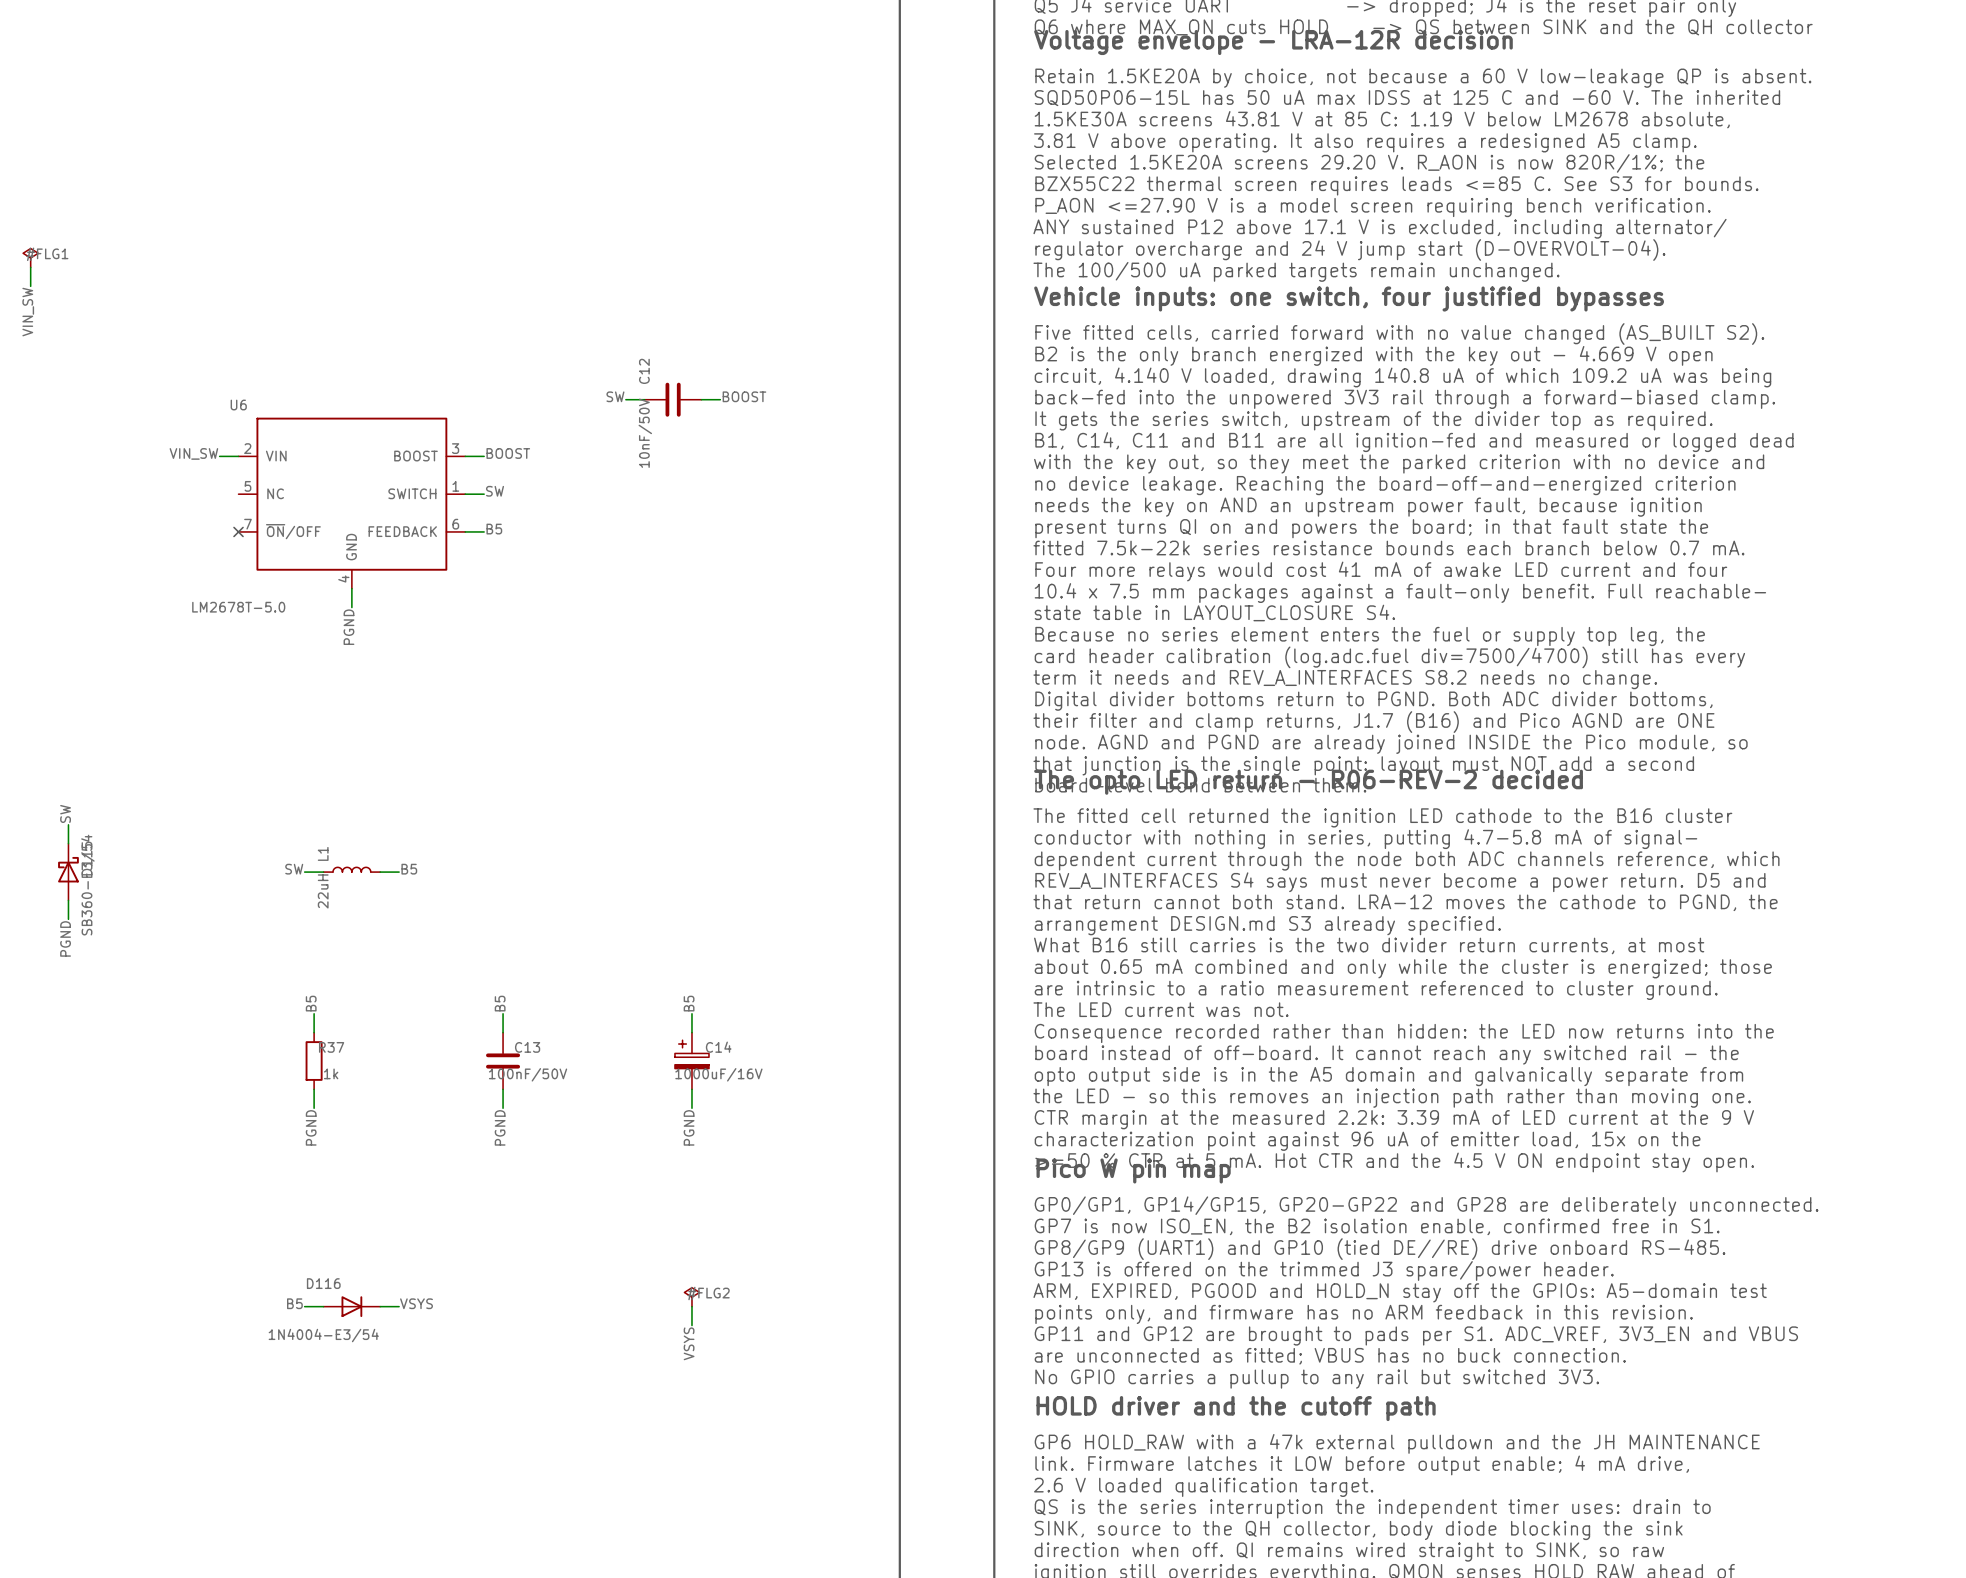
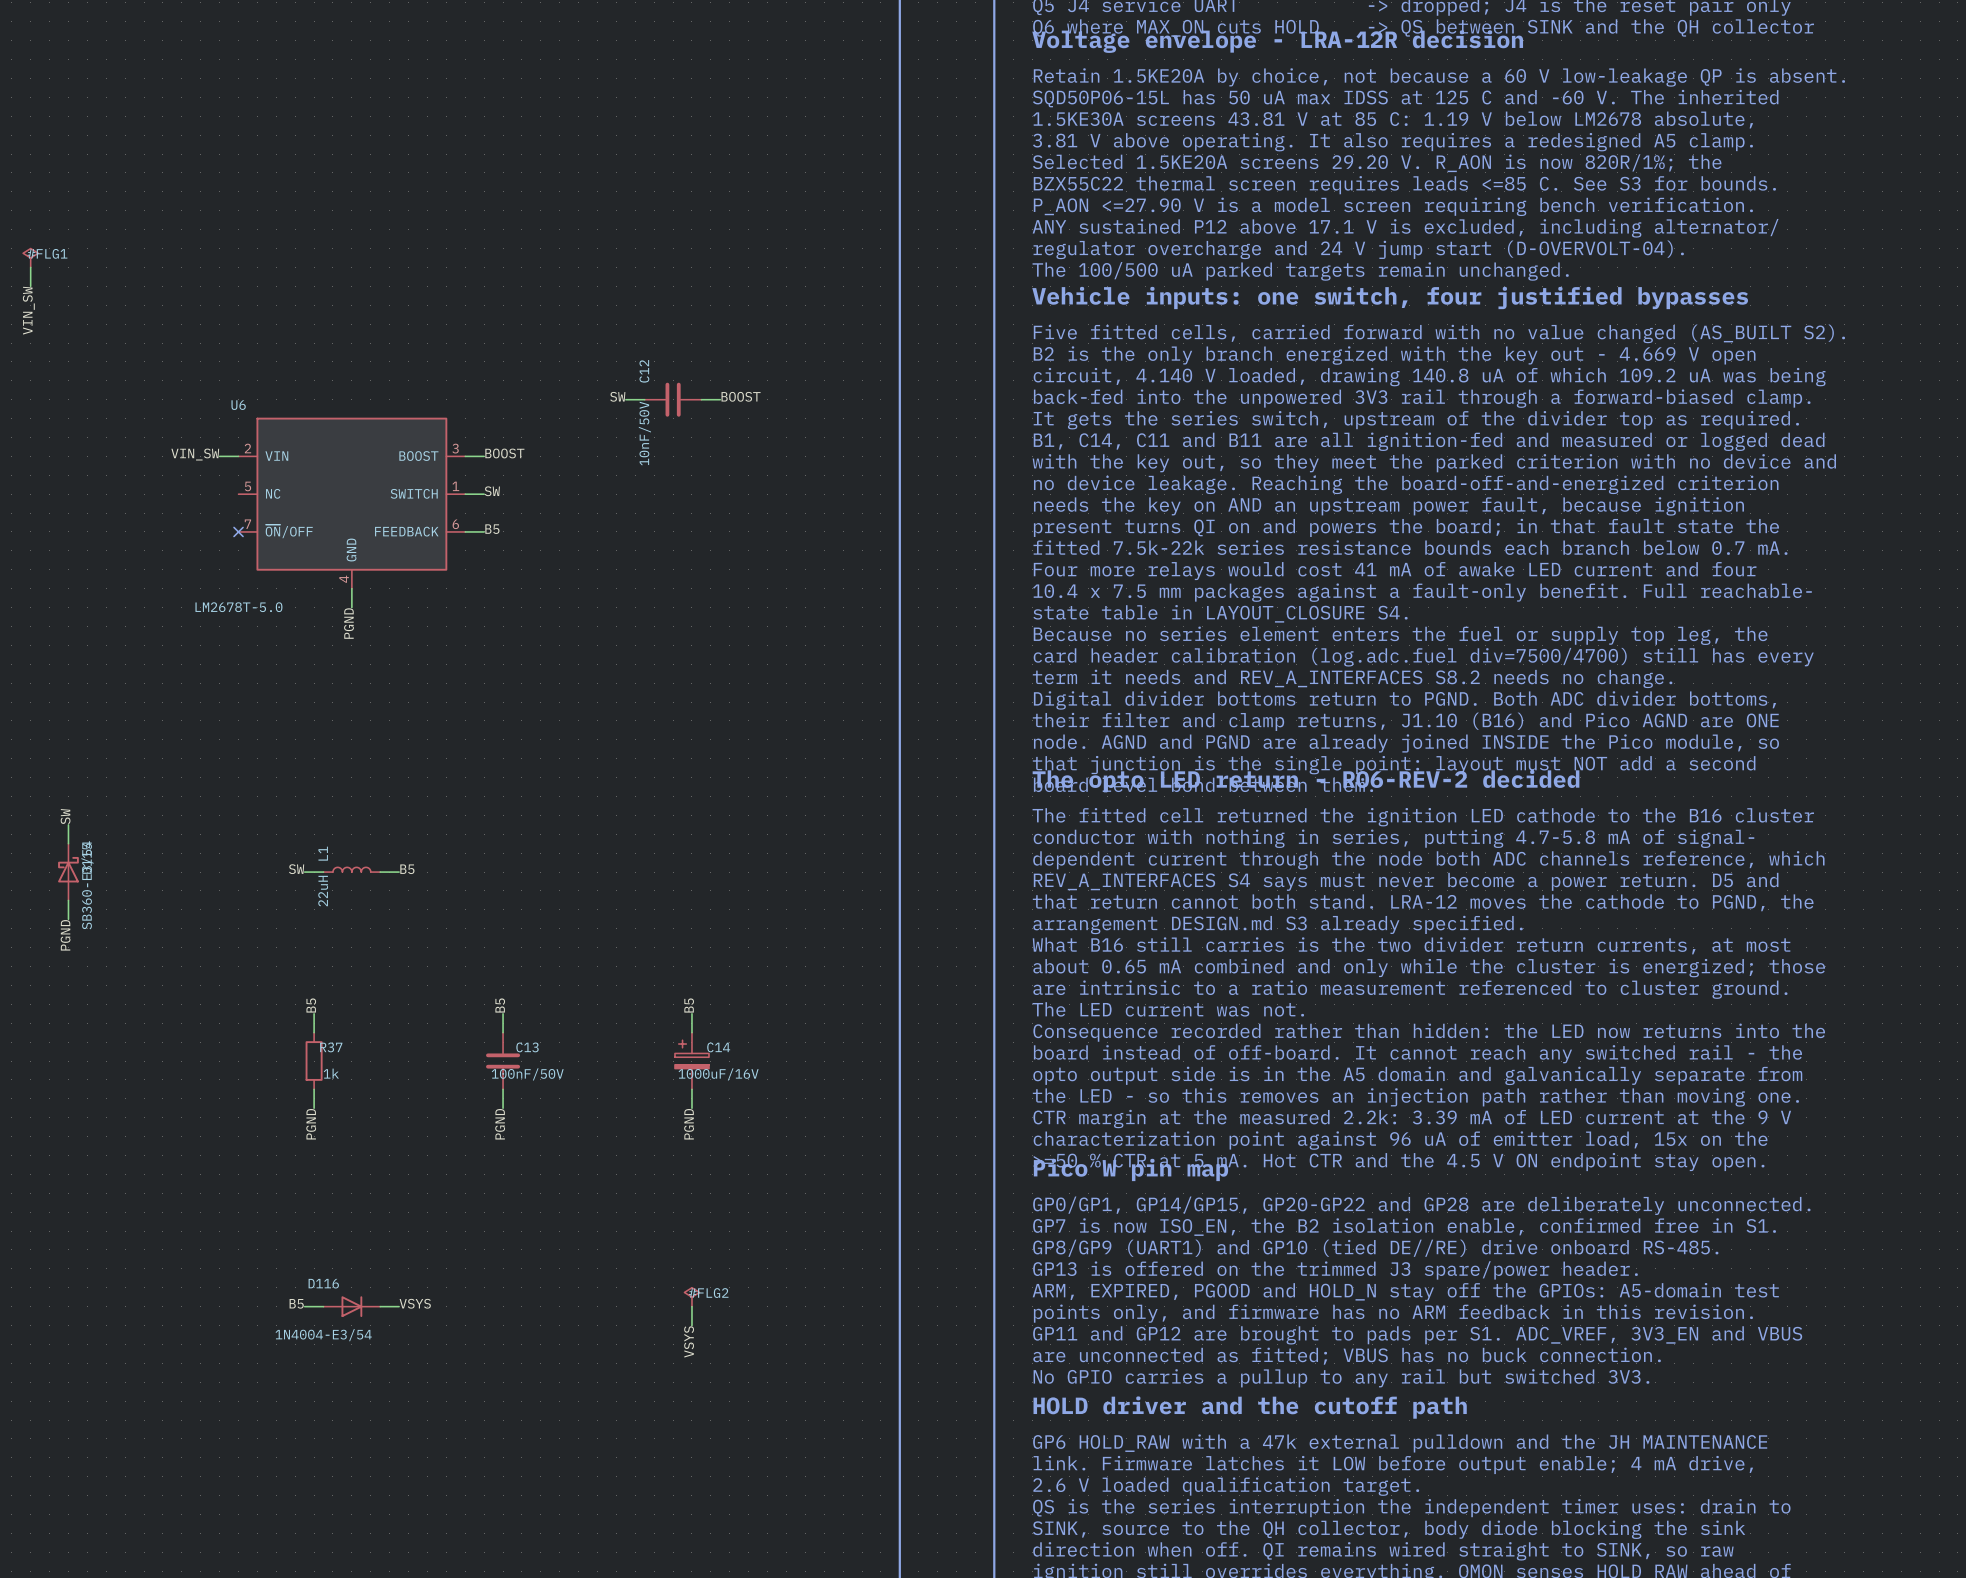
text: their filter and clamp returns, J1.7 (B16) and Pico AGND are ONE (1373, 722) -> their filter and clamp returns, J1.10 (B16) and Pico AGND are ONE (1405, 721)

